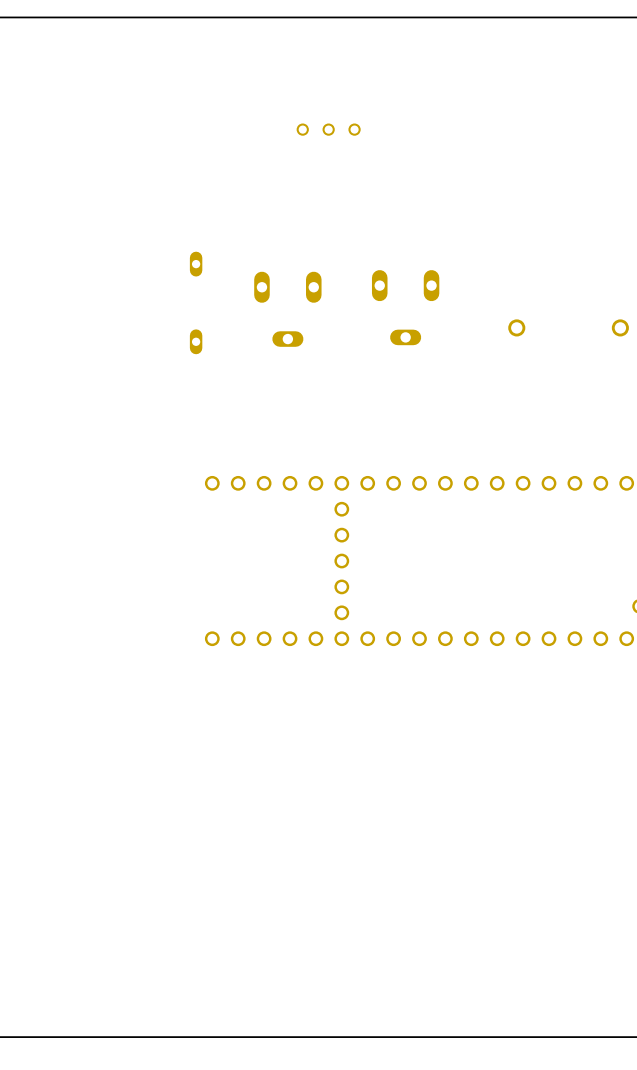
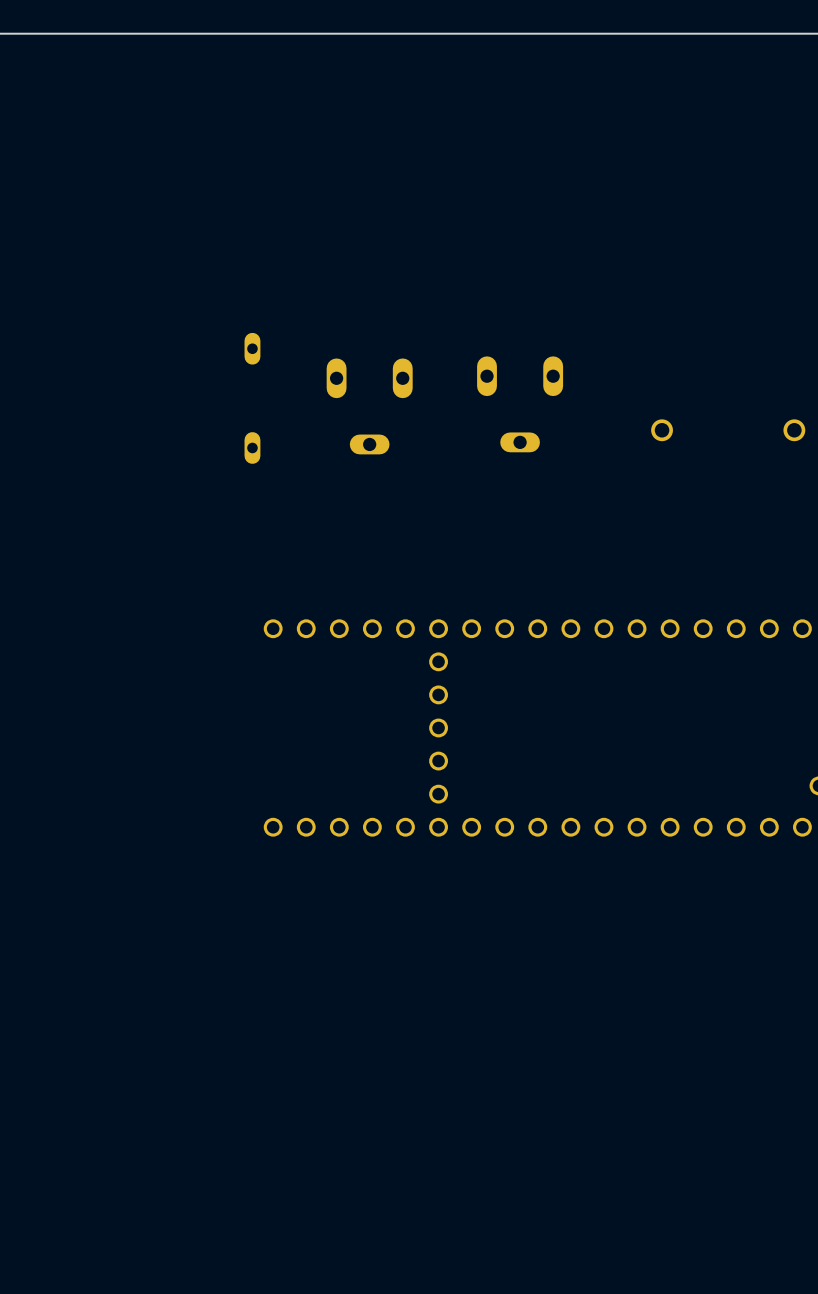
part: (328, 129) -> none

